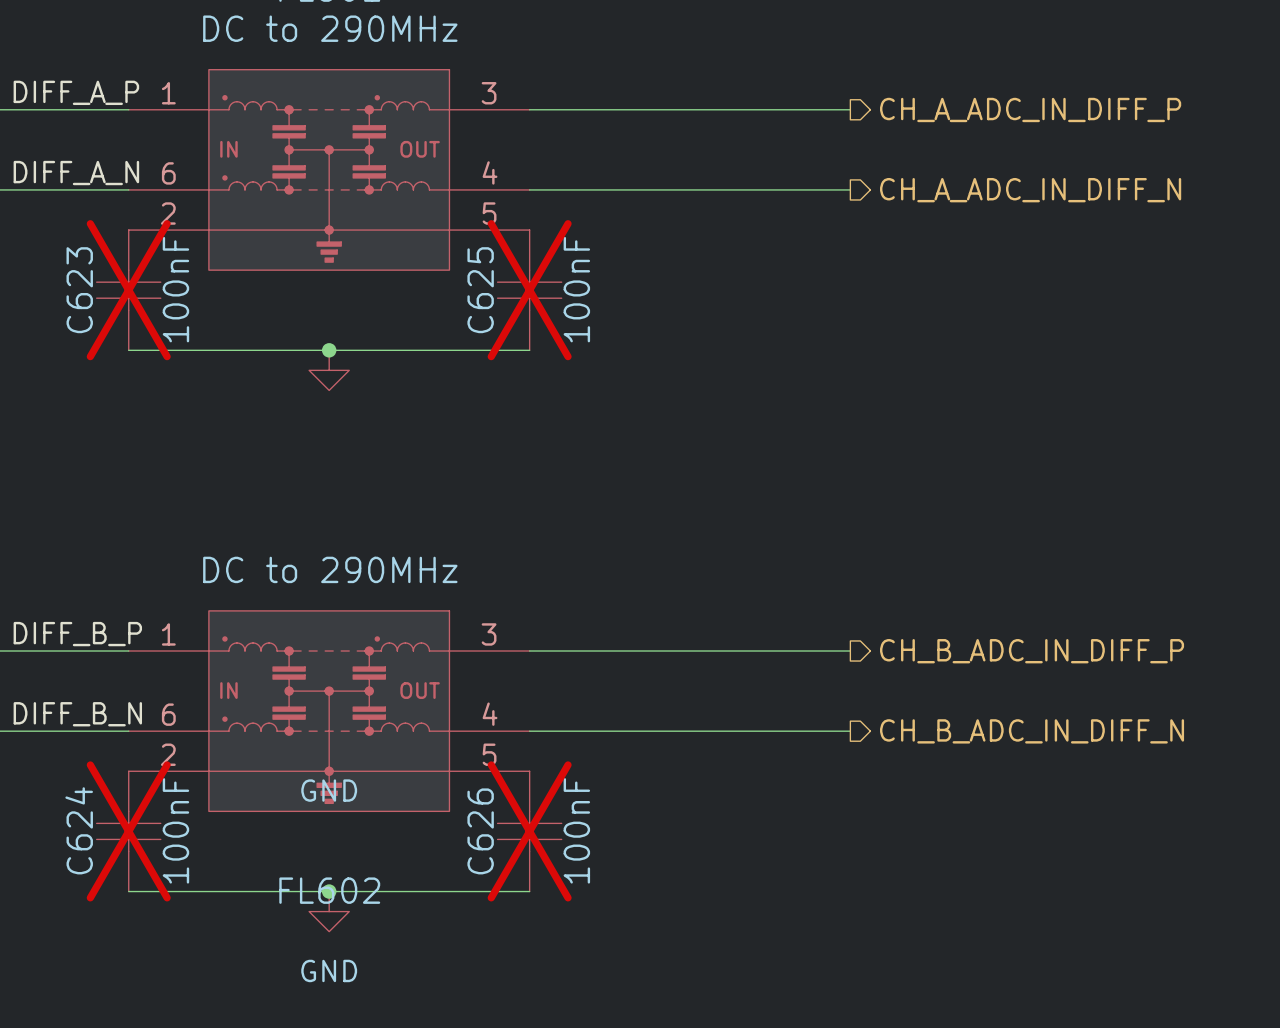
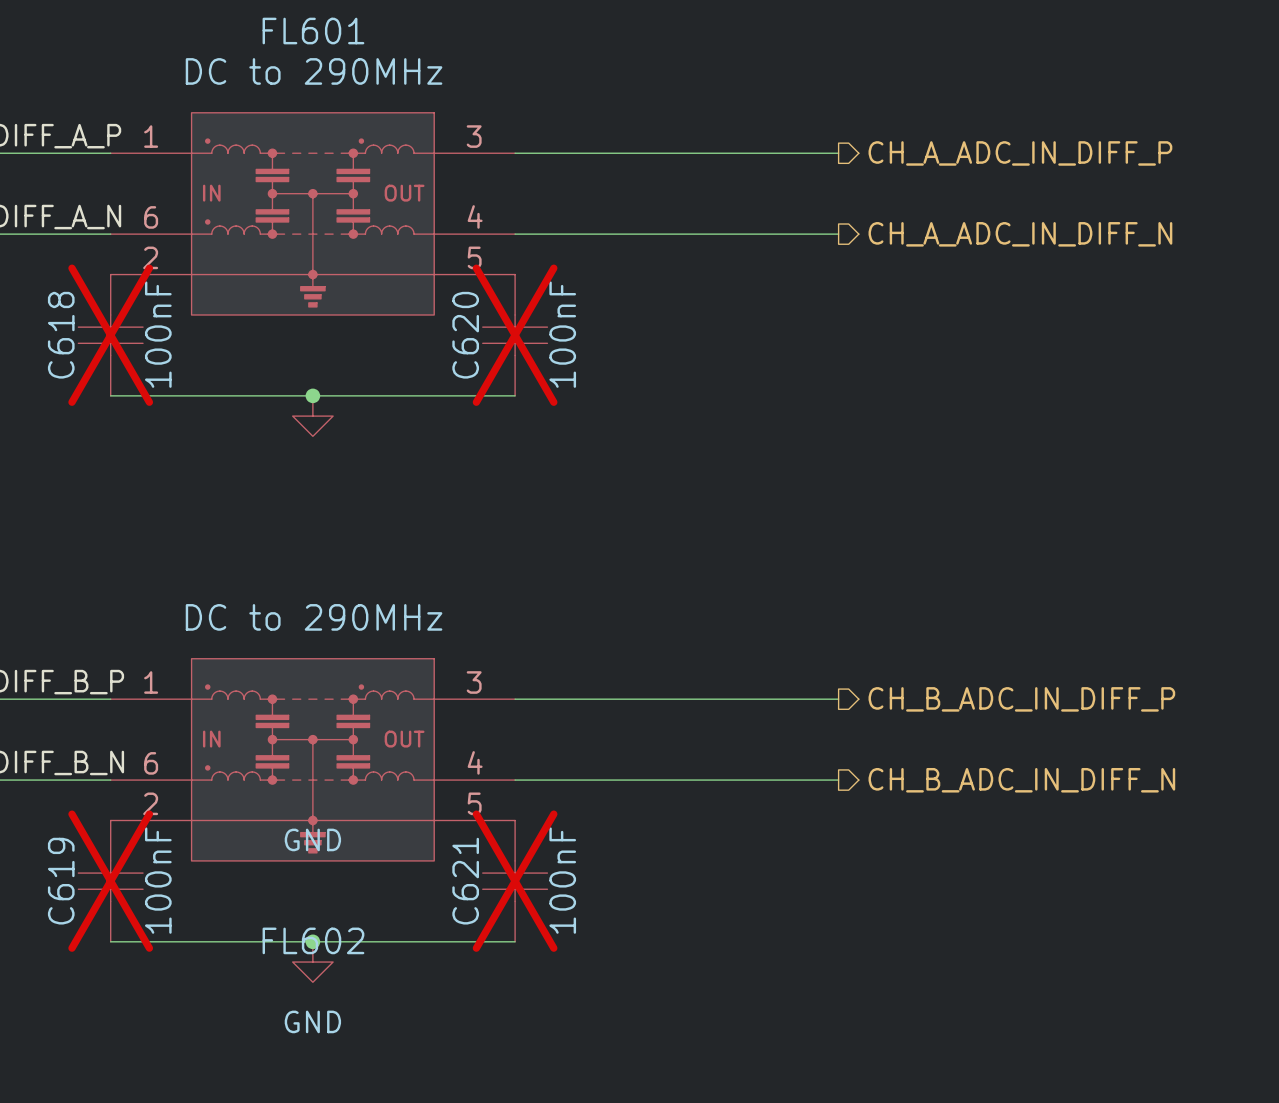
C623 name: C623 (79, 290) -> C618 (61, 335)
C625 name: C625 (480, 290) -> C620 (465, 335)
C624 name: C624 (79, 830) -> C619 (61, 881)
C626 name: C626 (480, 831) -> C621 (465, 881)

